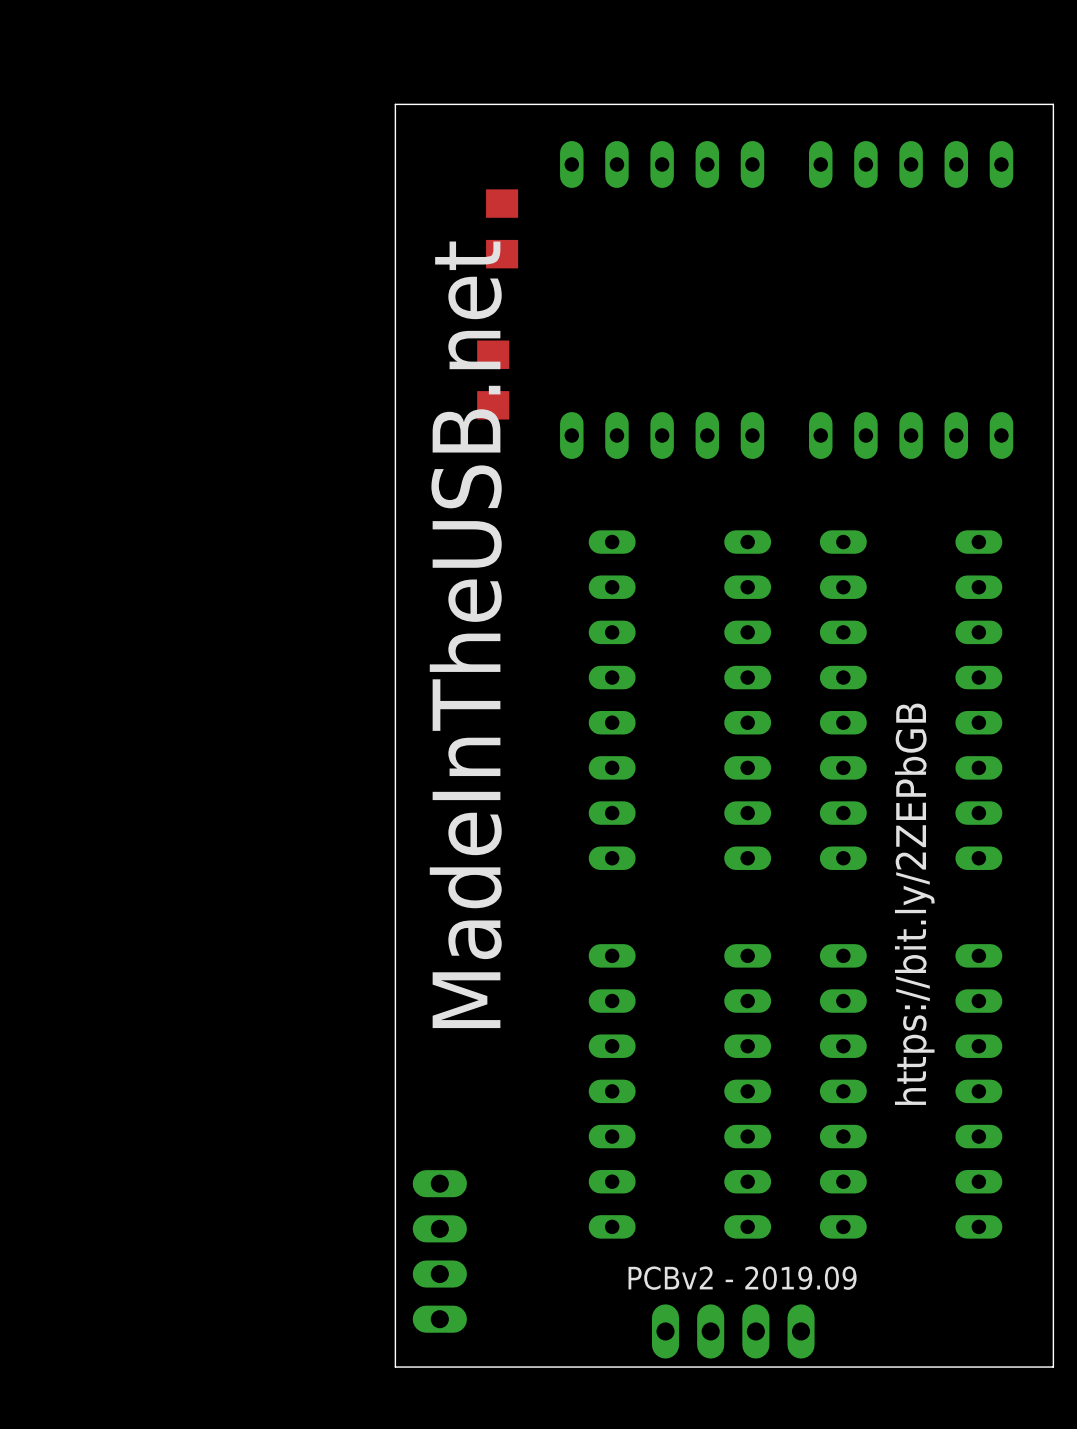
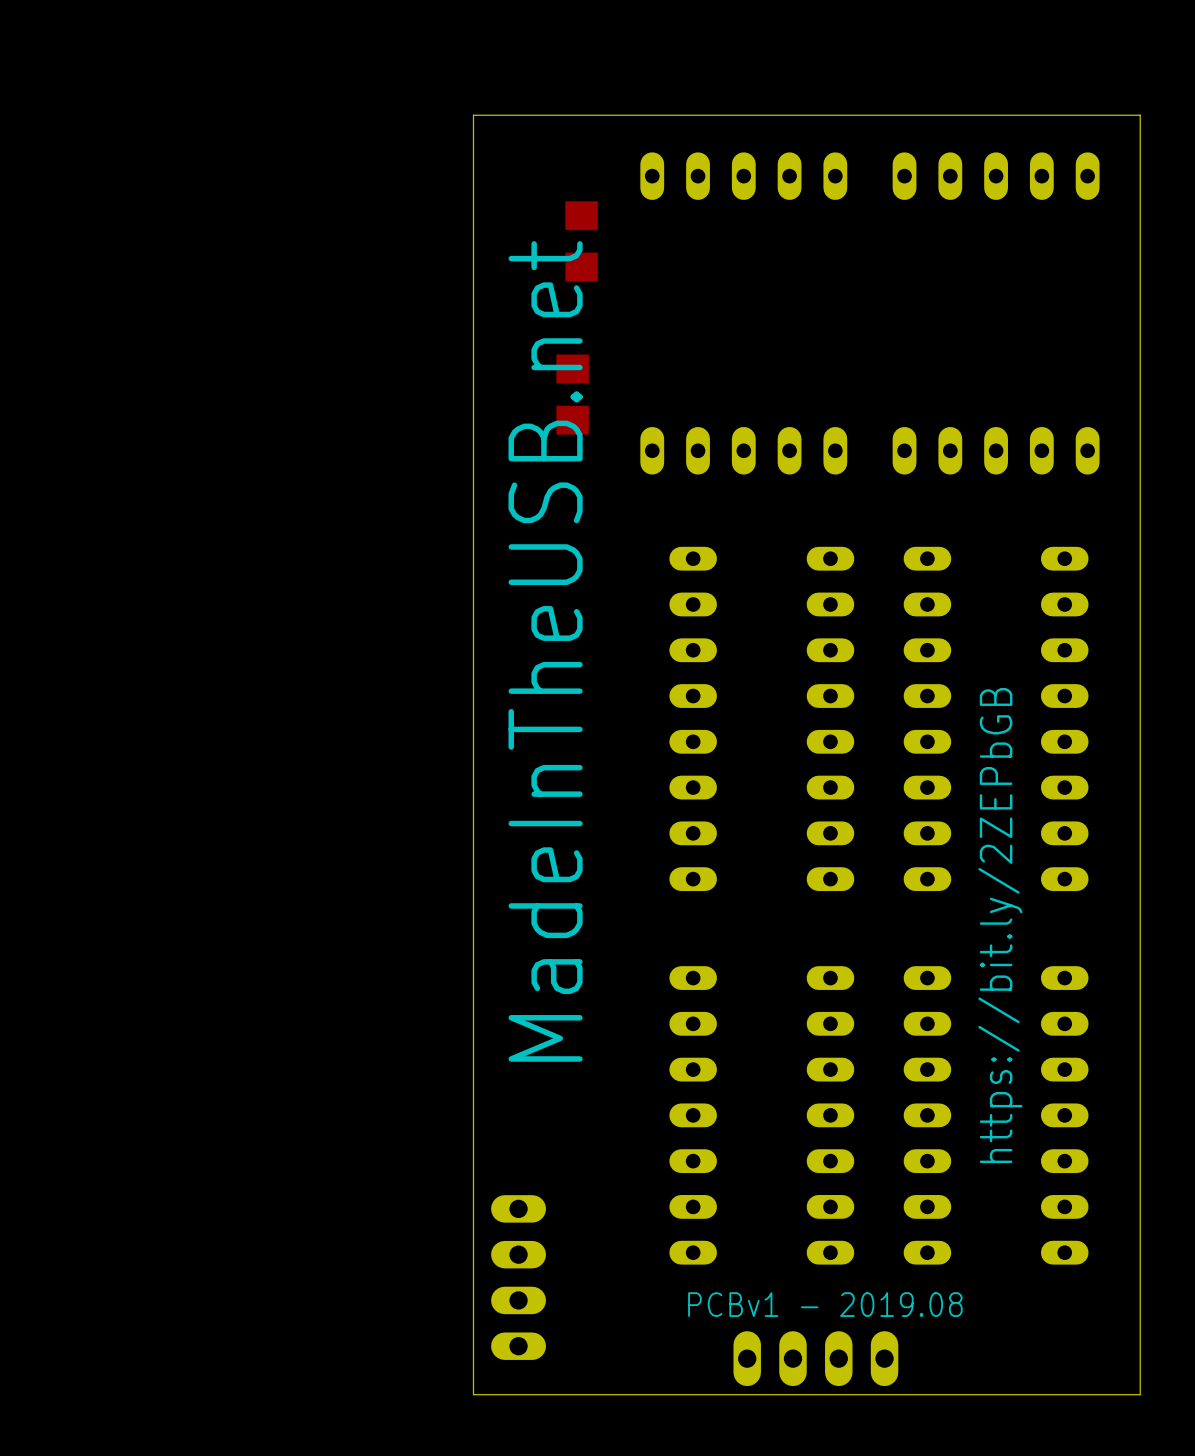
text: PCBv2 - 2019.09 (742, 1278) -> PCBv1 - 2019.08 (825, 1304)

